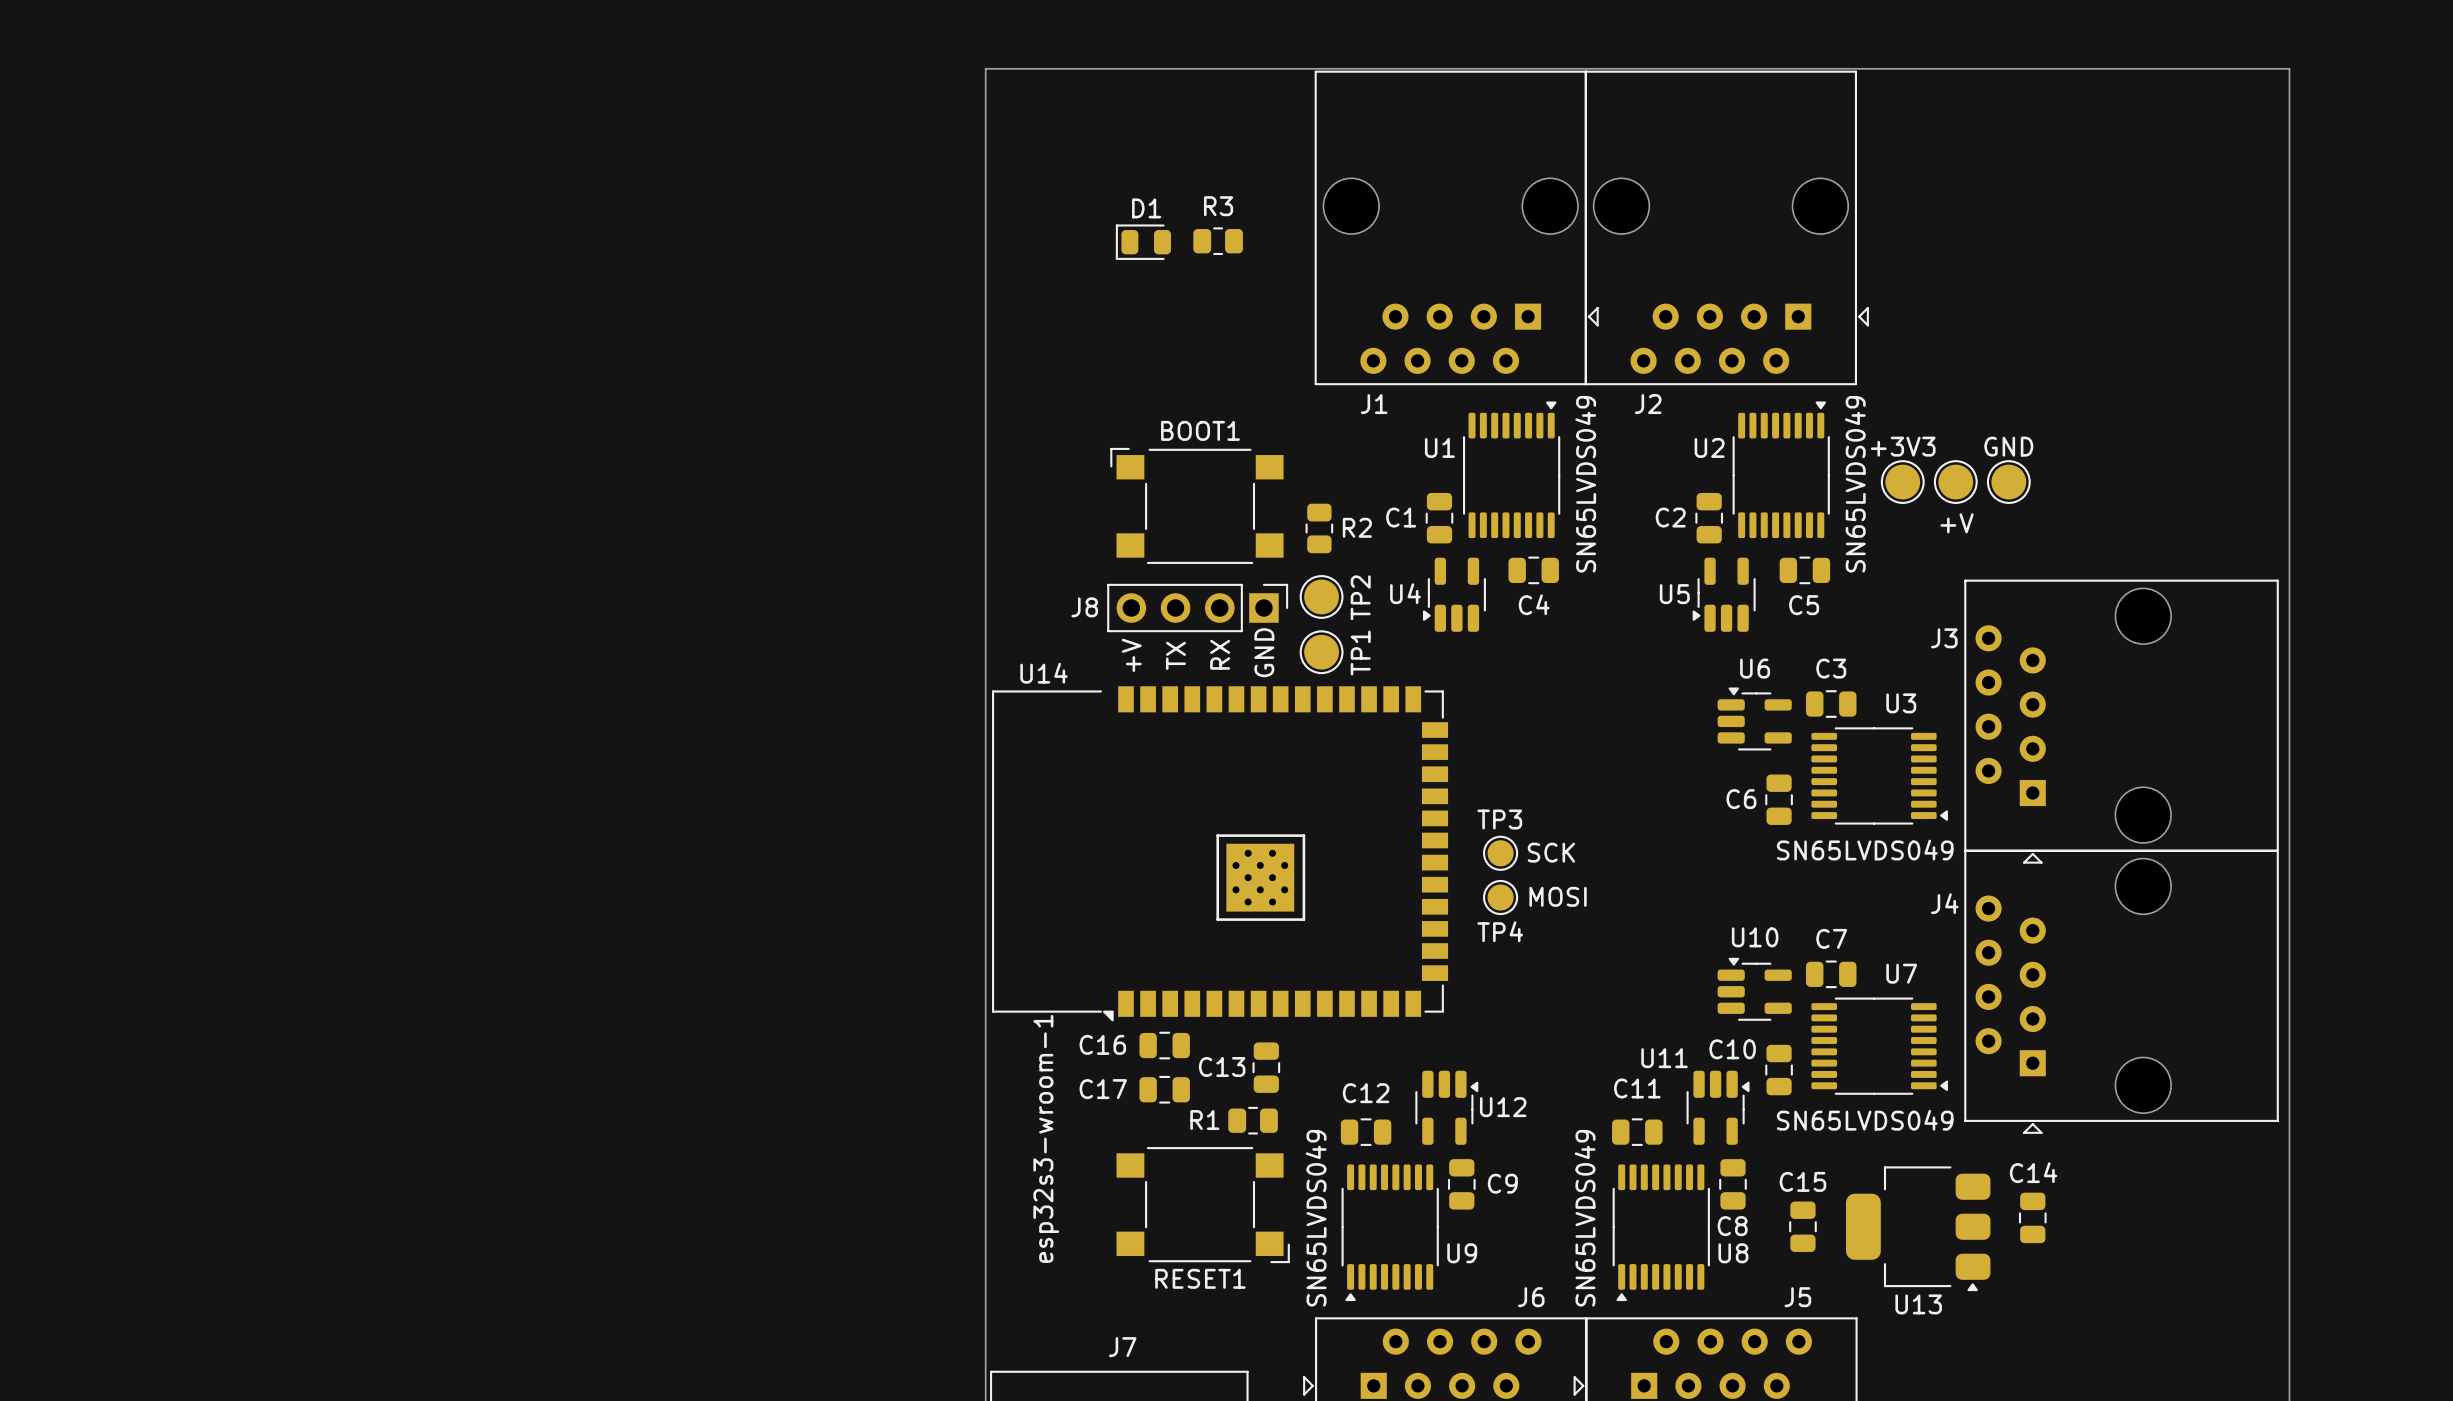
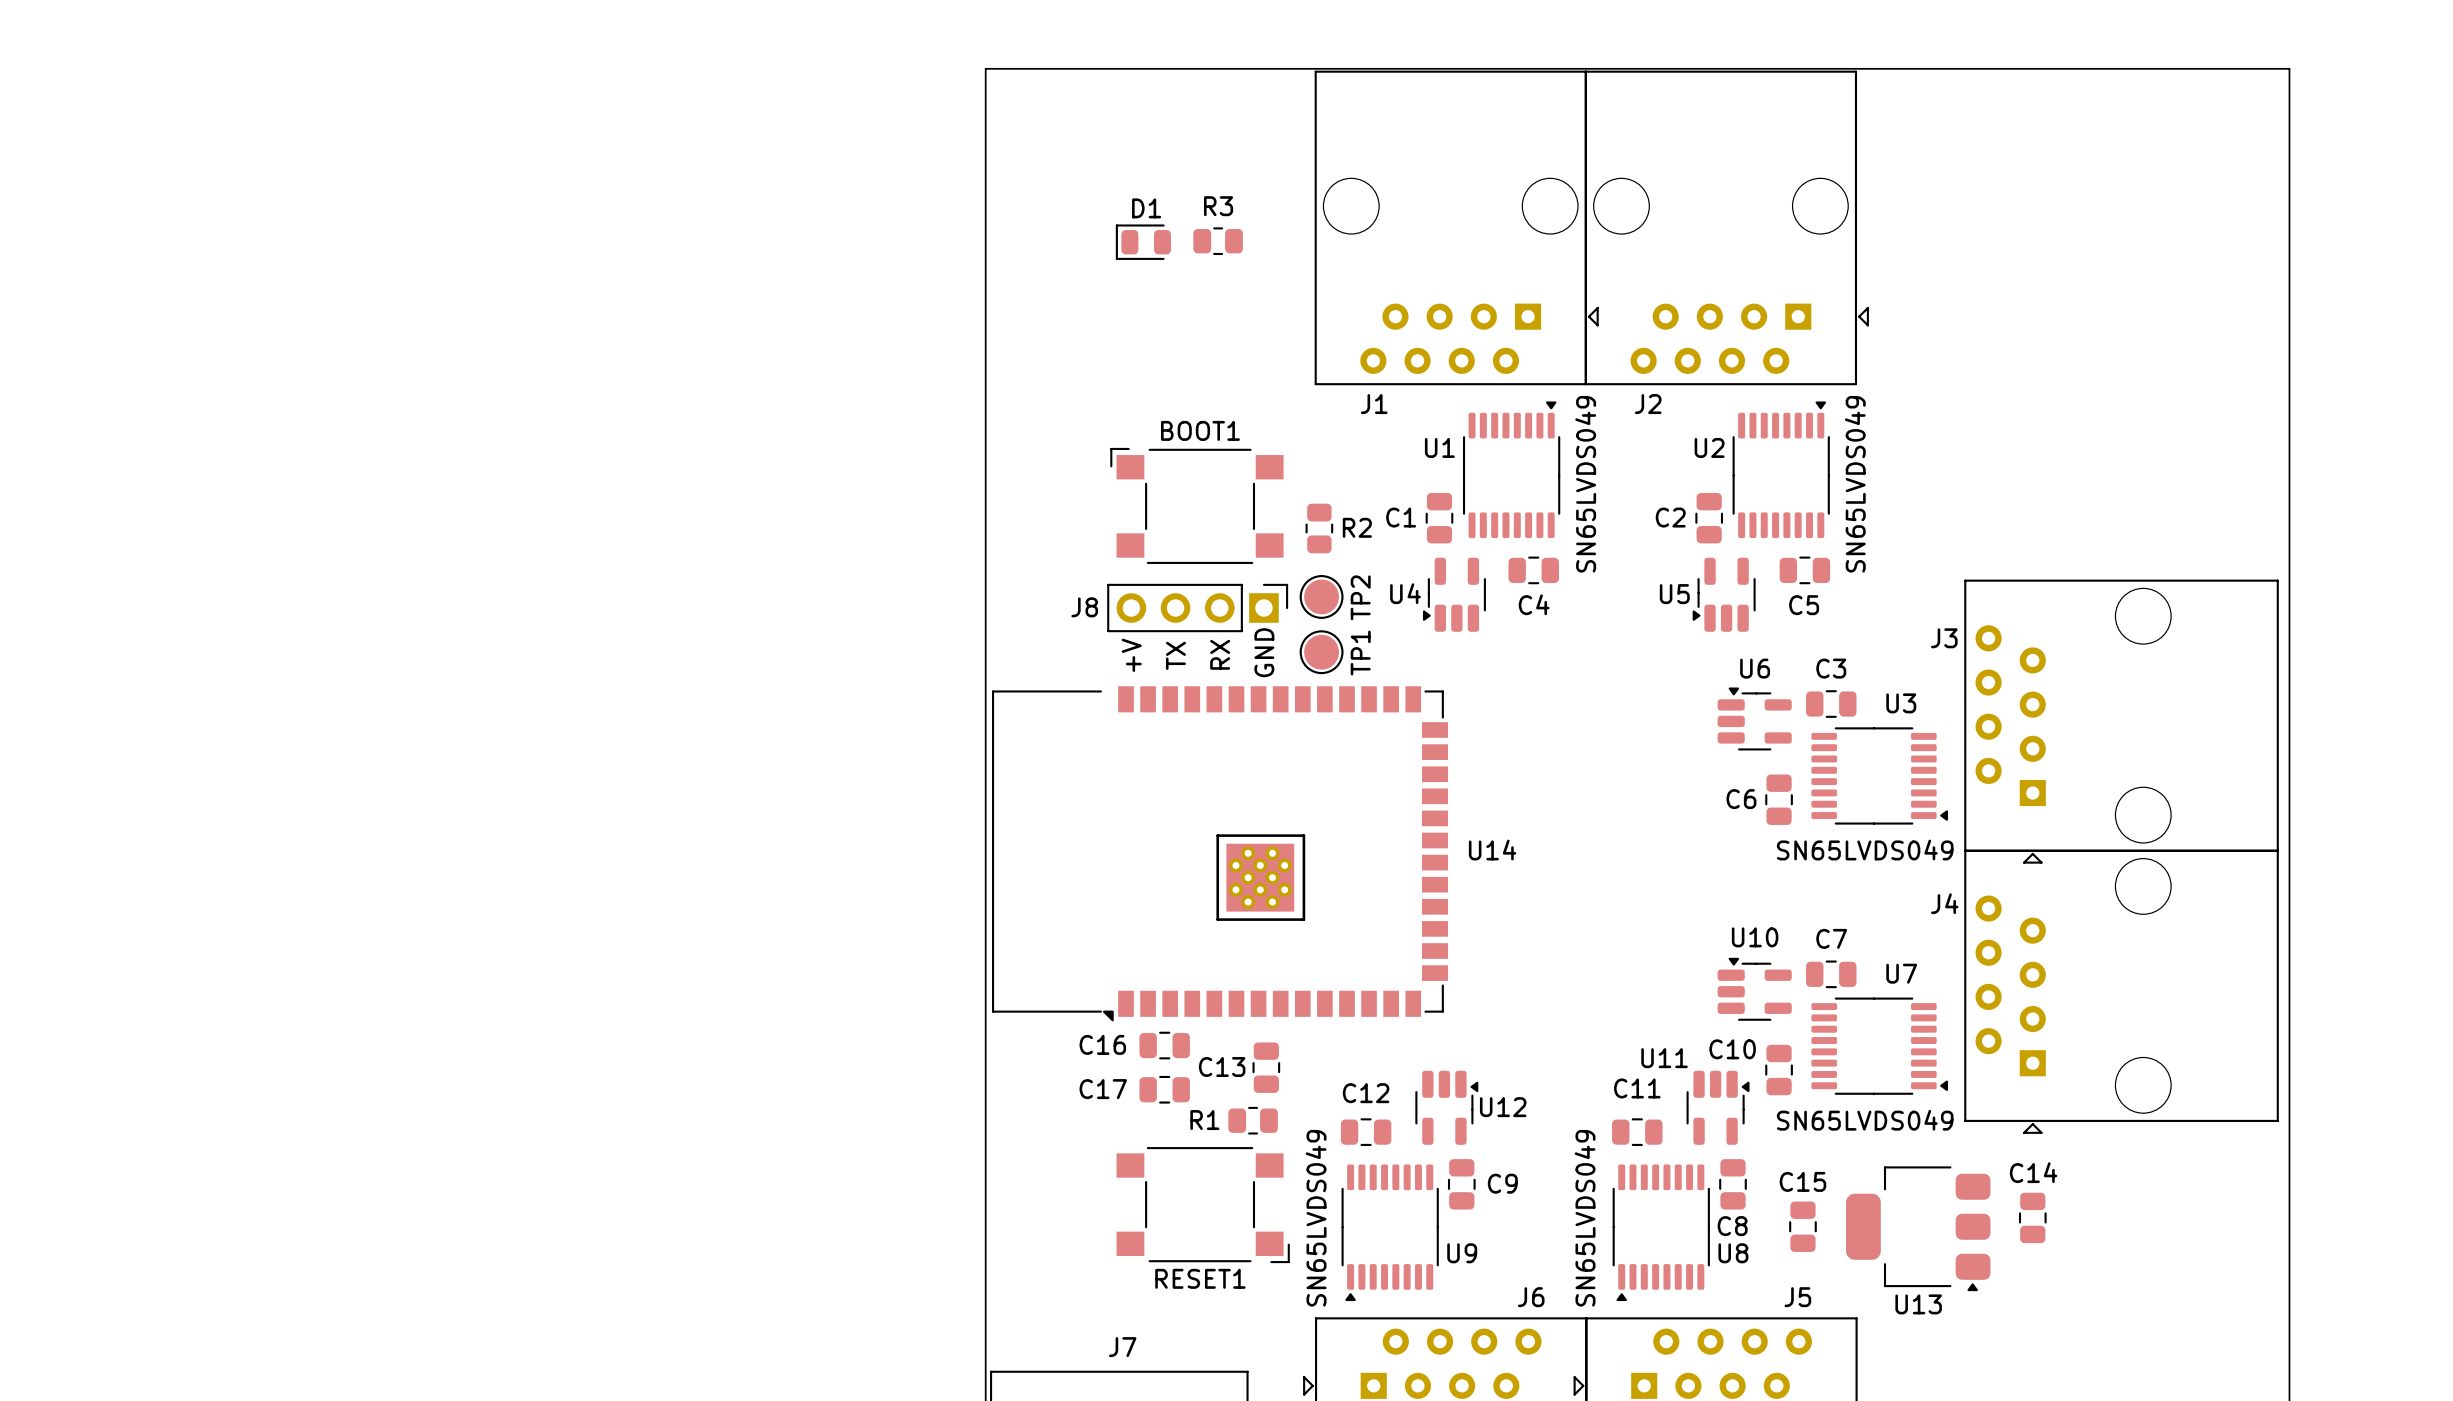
+3V3: (1902, 482) -> none
+V: (1955, 482) -> none
GND: (2008, 482) -> none
U14 name position: U14 (1043, 673) -> U14 (1492, 850)
TP3: SCK (1500, 853) -> none
TP4: MOSI (1500, 897) -> none
text: esp32s3-wroom-1 (1046, 1138) -> none

